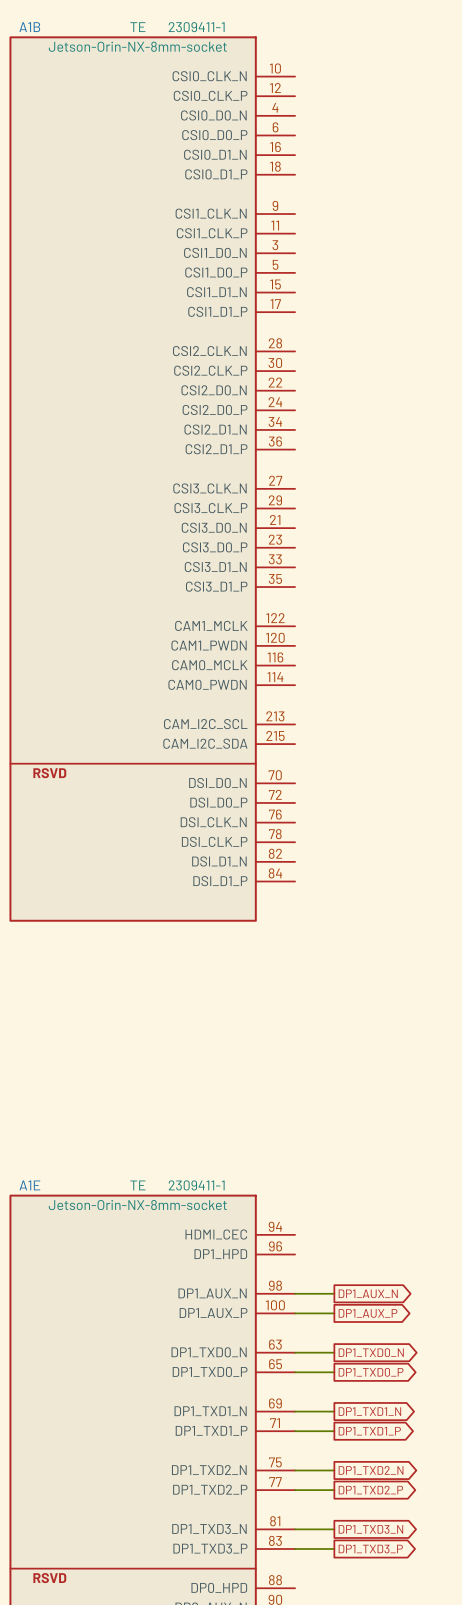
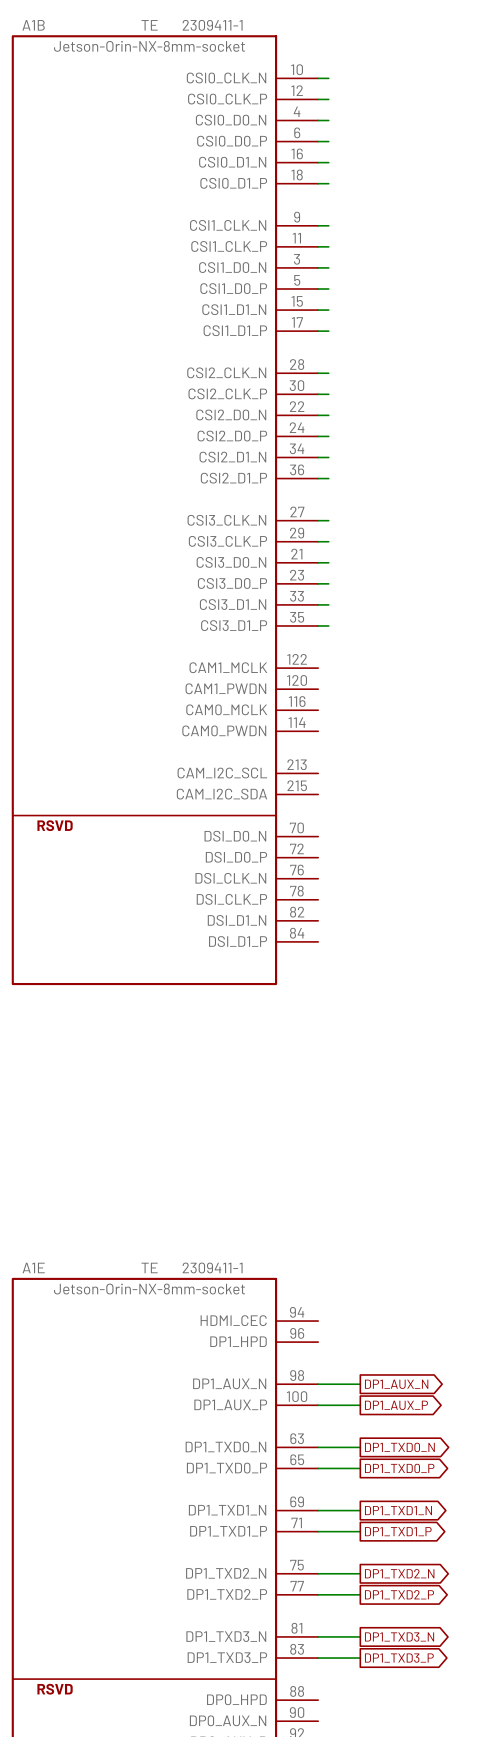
wire: none -> (318, 78) (328, 78)
wire: none -> (318, 99) (328, 99)
wire: none -> (318, 120) (328, 120)
wire: none -> (318, 141) (328, 141)
wire: none -> (318, 162) (328, 162)
wire: none -> (318, 183) (328, 183)
wire: none -> (318, 225) (328, 225)
wire: none -> (318, 246) (328, 246)
wire: none -> (318, 267) (328, 267)
wire: none -> (318, 289) (328, 289)
wire: none -> (318, 310) (328, 310)
wire: none -> (318, 331) (328, 331)
wire: none -> (318, 373) (328, 373)
wire: none -> (318, 394) (328, 394)
wire: none -> (318, 415) (328, 415)
wire: none -> (318, 436) (328, 436)
wire: none -> (318, 457) (328, 457)
wire: none -> (318, 478) (328, 478)
wire: none -> (318, 520) (328, 520)
wire: none -> (318, 541) (328, 541)
wire: none -> (318, 562) (328, 562)
wire: none -> (318, 583) (328, 583)
wire: none -> (318, 604) (328, 604)
wire: none -> (318, 625) (328, 625)

